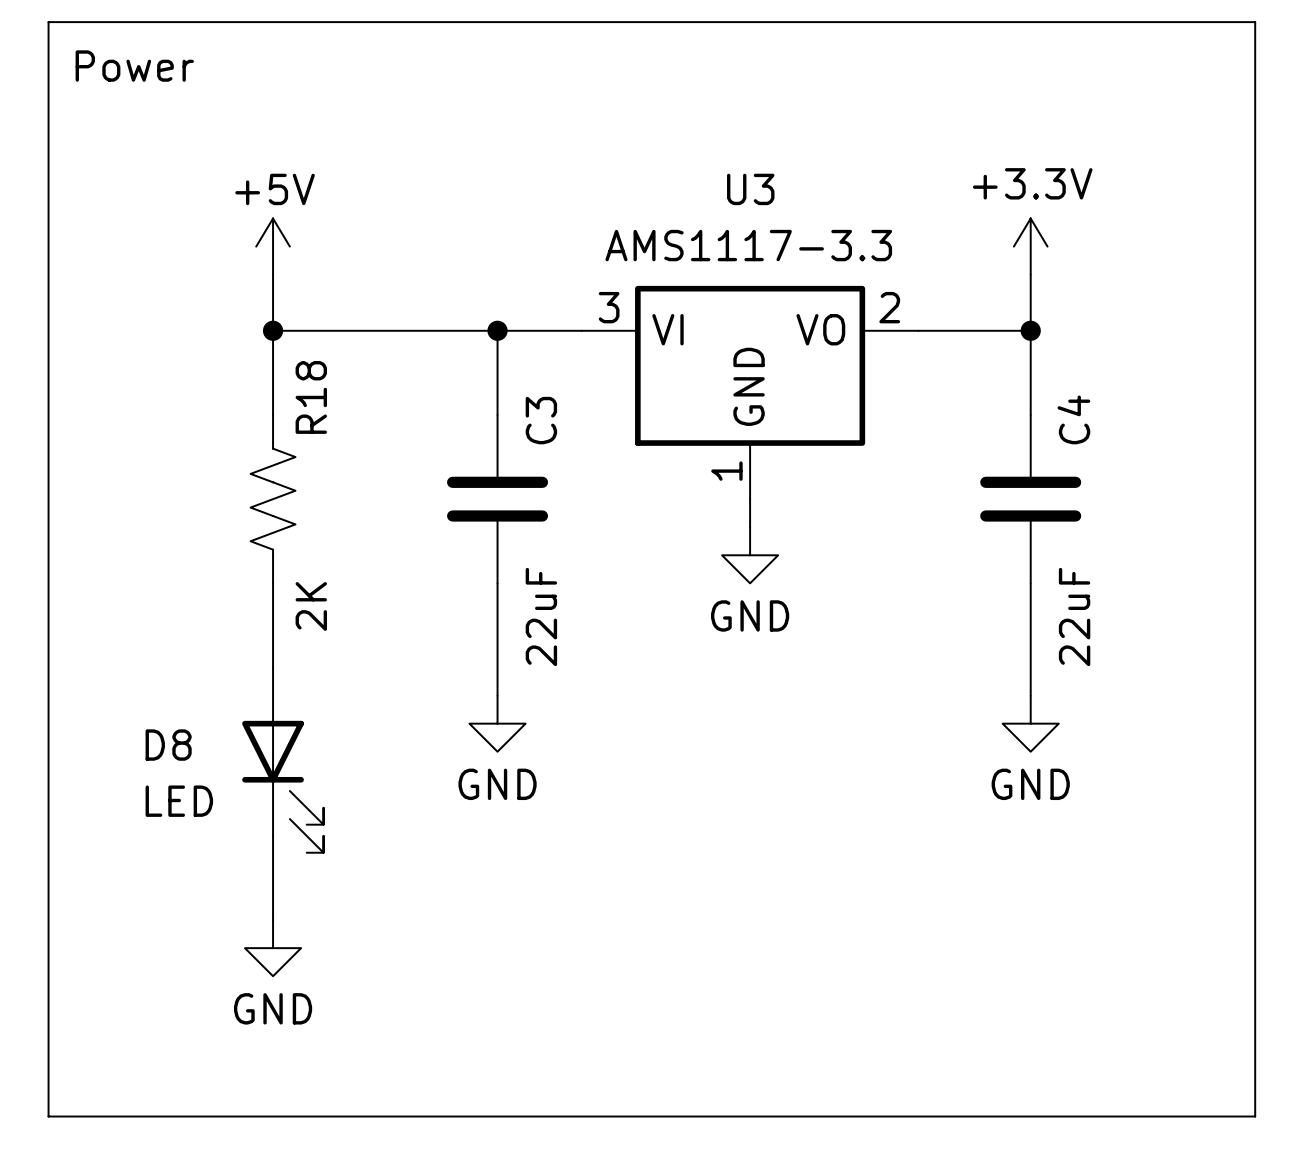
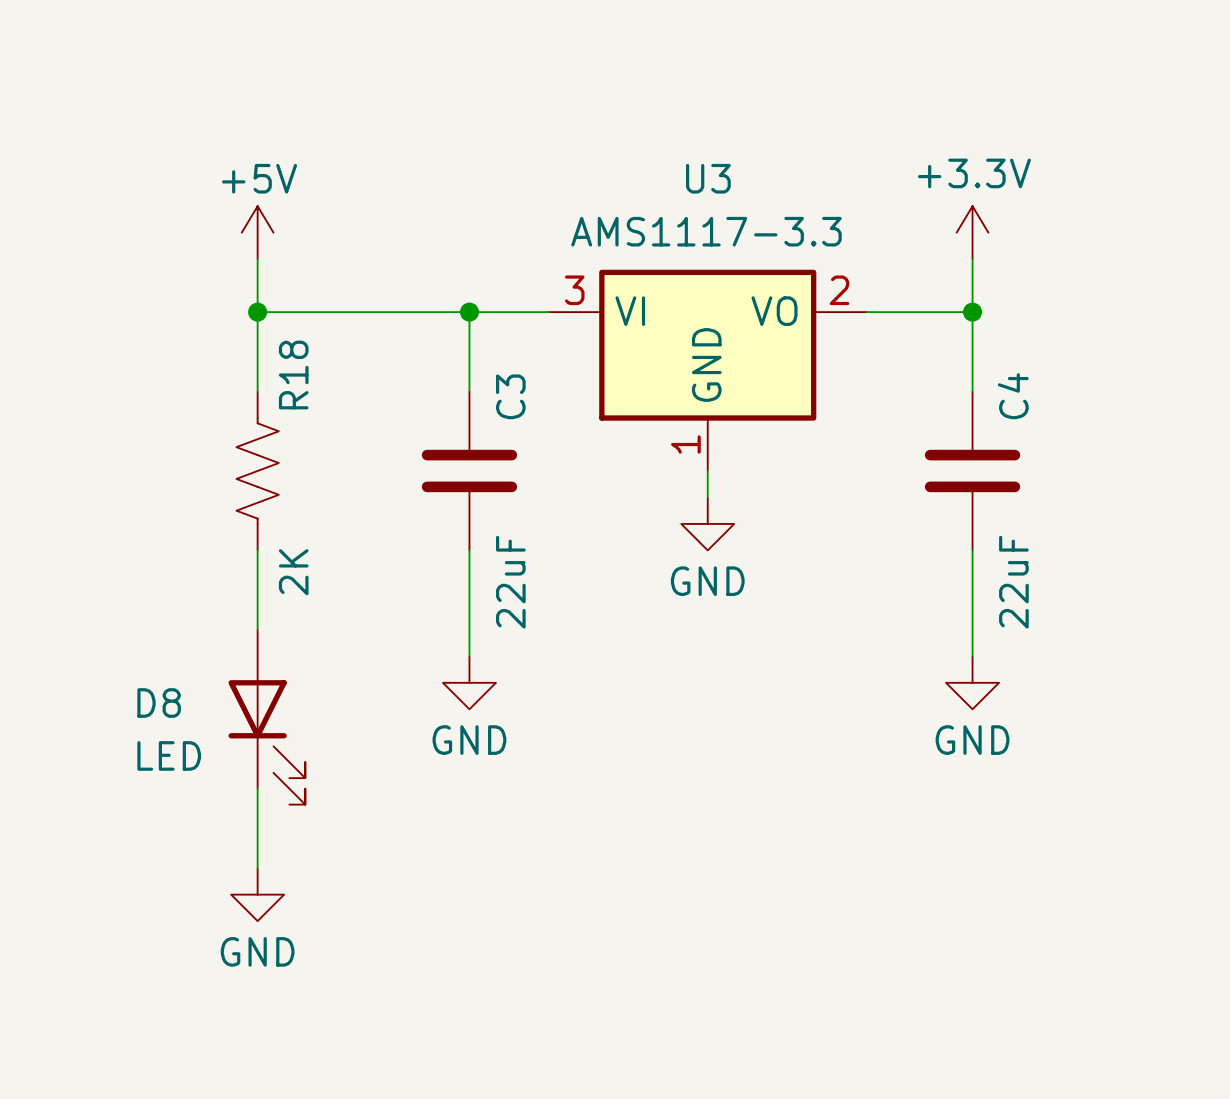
line: (48, 22) (1255, 22) (1255, 1116) (48, 1116) (48, 22) -> none
text: Power (134, 66) -> none

